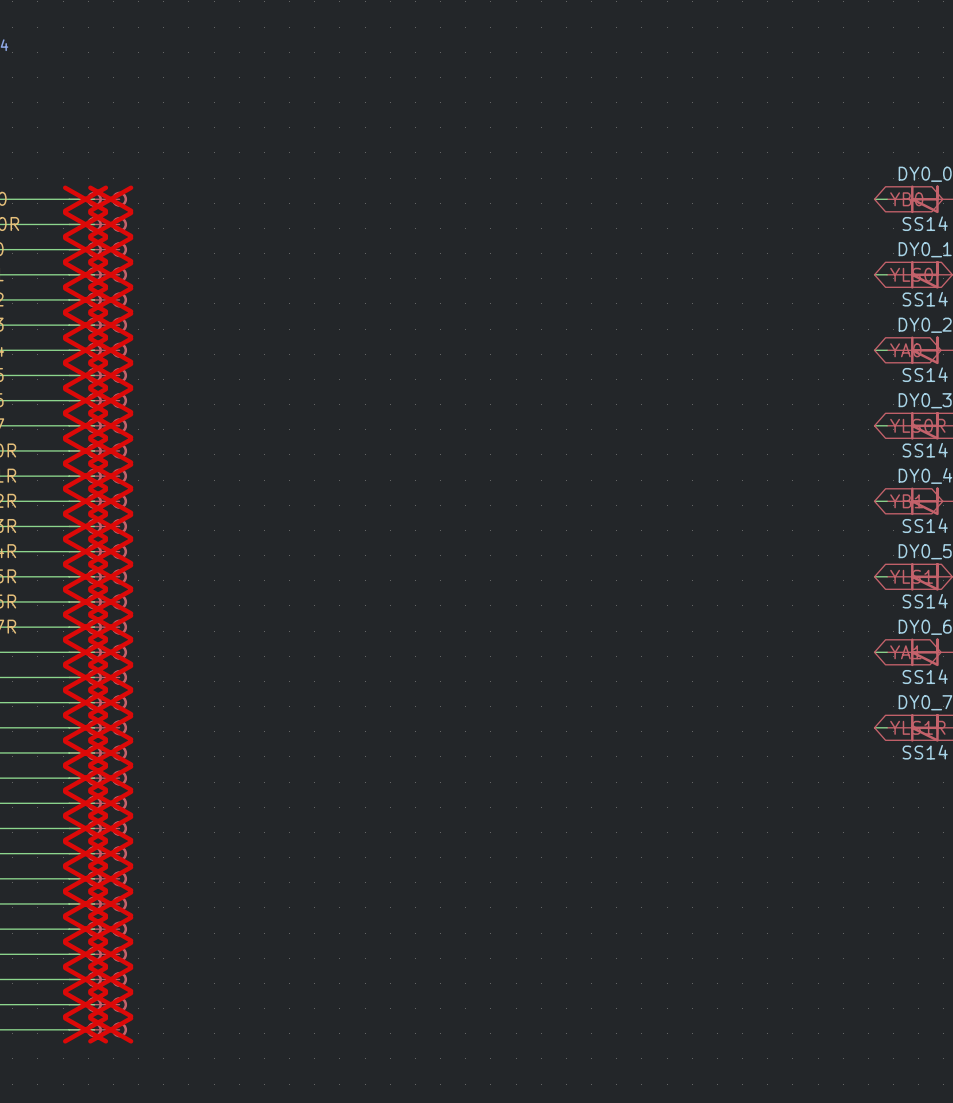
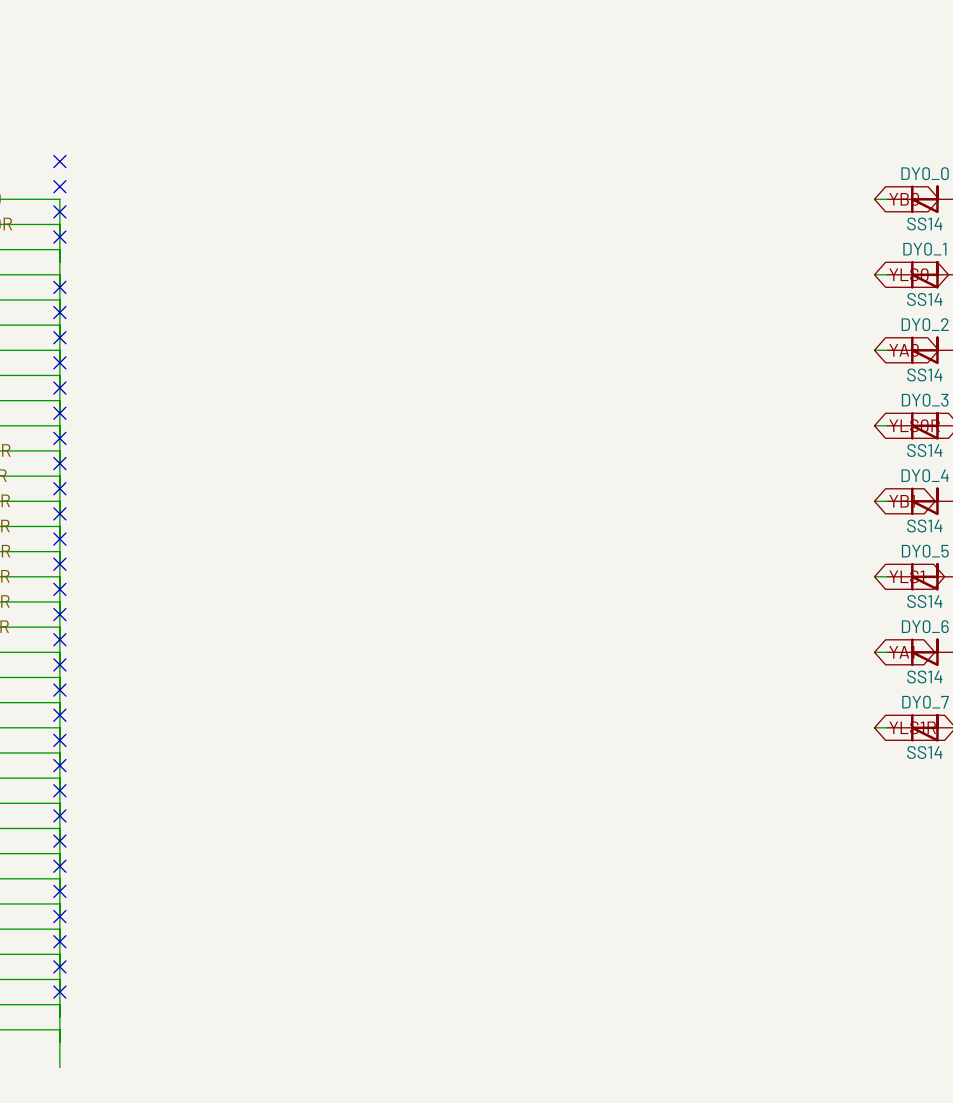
no-connect mark: none -> (59, 161)
no-connect mark: none -> (59, 186)
wire: (59, 199) (94, 199) -> (59, 199) (59, 1067)
part: (85, 199) -> none
part: (110, 199) -> none
no-connect mark: none -> (59, 211)
wire: (59, 224) (94, 224) -> none
part: (85, 224) -> none
part: (110, 224) -> none
no-connect mark: none -> (59, 237)
wire: (59, 249) (94, 249) -> none
part: (85, 249) -> none
part: (110, 249) -> none
wire: (59, 274) (94, 274) -> none
part: (85, 274) -> none
part: (110, 274) -> none
no-connect mark: none -> (59, 287)
wire: (59, 299) (94, 299) -> none
part: (85, 299) -> none
part: (110, 299) -> none
no-connect mark: none -> (59, 312)
wire: (59, 325) (94, 325) -> none
part: (85, 325) -> none
part: (110, 325) -> none
no-connect mark: none -> (59, 337)
wire: (59, 350) (94, 350) -> none
part: (85, 350) -> none
part: (110, 350) -> none
no-connect mark: none -> (59, 362)
wire: (59, 375) (94, 375) -> none
part: (85, 375) -> none
part: (110, 375) -> none
no-connect mark: none -> (59, 388)
wire: (59, 400) (94, 400) -> none
part: (85, 400) -> none
part: (110, 400) -> none
no-connect mark: none -> (59, 413)
wire: (59, 425) (94, 425) -> none
part: (85, 425) -> none
part: (110, 425) -> none
no-connect mark: none -> (59, 438)
wire: (59, 450) (94, 450) -> none
part: (85, 450) -> none
part: (110, 450) -> none
no-connect mark: none -> (59, 463)
wire: (59, 476) (94, 476) -> none
part: (85, 476) -> none
part: (110, 476) -> none
no-connect mark: none -> (59, 488)
wire: (59, 501) (94, 501) -> none
part: (85, 501) -> none
part: (110, 501) -> none
no-connect mark: none -> (59, 513)
wire: (59, 526) (94, 526) -> none
part: (85, 526) -> none
part: (110, 526) -> none
no-connect mark: none -> (59, 539)
wire: (59, 551) (94, 551) -> none
part: (85, 551) -> none
part: (110, 551) -> none
no-connect mark: none -> (59, 564)
wire: (59, 576) (94, 576) -> none
part: (85, 576) -> none
part: (110, 576) -> none
no-connect mark: none -> (59, 589)
wire: (59, 601) (94, 601) -> none
part: (85, 601) -> none
part: (110, 601) -> none
no-connect mark: none -> (59, 614)
wire: (59, 627) (94, 627) -> none
part: (85, 627) -> none
part: (110, 627) -> none
no-connect mark: none -> (59, 639)
wire: (59, 652) (94, 652) -> none
part: (85, 652) -> none
part: (110, 652) -> none
no-connect mark: none -> (59, 664)
wire: (59, 677) (94, 677) -> none
part: (85, 677) -> none
part: (110, 677) -> none
no-connect mark: none -> (59, 690)
wire: (59, 702) (94, 702) -> none
part: (85, 702) -> none
part: (110, 702) -> none
no-connect mark: none -> (59, 715)
wire: (59, 727) (94, 727) -> none
part: (85, 727) -> none
part: (110, 727) -> none
no-connect mark: none -> (59, 740)
wire: (59, 752) (94, 752) -> none
part: (85, 752) -> none
part: (110, 752) -> none
no-connect mark: none -> (59, 765)
wire: (59, 778) (94, 778) -> none
part: (85, 778) -> none
part: (110, 778) -> none
no-connect mark: none -> (59, 790)
wire: (59, 803) (94, 803) -> none
part: (85, 803) -> none
part: (110, 803) -> none
no-connect mark: none -> (59, 815)
wire: (59, 828) (94, 828) -> none
part: (85, 828) -> none
part: (110, 828) -> none
no-connect mark: none -> (59, 841)
wire: (59, 853) (94, 853) -> none
part: (85, 853) -> none
part: (110, 853) -> none
no-connect mark: none -> (59, 866)
wire: (59, 878) (94, 878) -> none
part: (85, 878) -> none
part: (110, 878) -> none
no-connect mark: none -> (59, 891)
wire: (59, 903) (94, 903) -> none
part: (85, 903) -> none
part: (110, 903) -> none
no-connect mark: none -> (59, 916)
wire: (59, 929) (94, 929) -> none
part: (85, 929) -> none
part: (110, 929) -> none
no-connect mark: none -> (59, 941)
wire: (59, 954) (94, 954) -> none
part: (85, 954) -> none
part: (110, 954) -> none
no-connect mark: none -> (59, 966)
wire: (59, 979) (94, 979) -> none
part: (85, 979) -> none
part: (110, 979) -> none
no-connect mark: none -> (59, 992)
wire: (59, 1004) (94, 1004) -> none
part: (85, 1004) -> none
part: (110, 1004) -> none
wire: (59, 1029) (94, 1029) -> none
part: (85, 1029) -> none
part: (110, 1029) -> none

